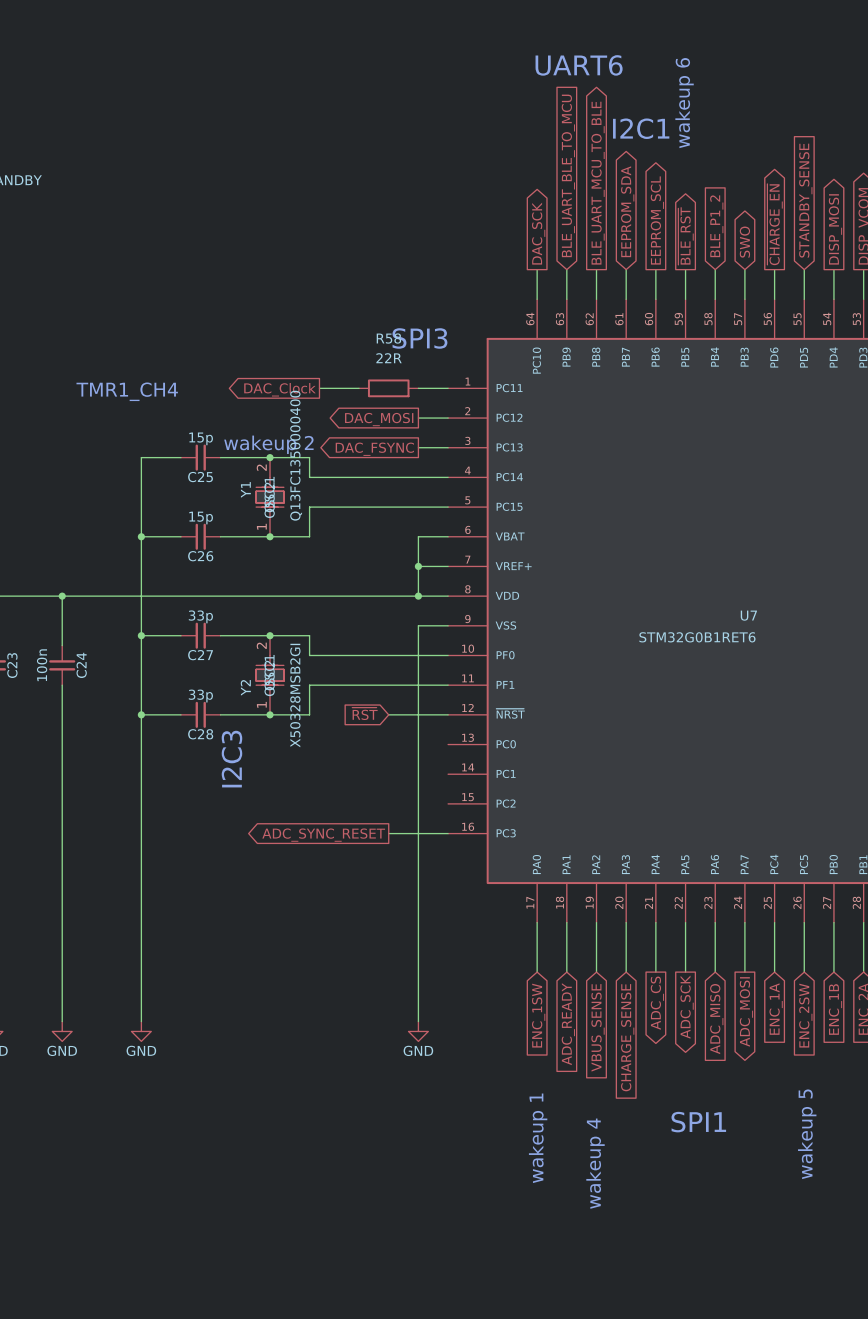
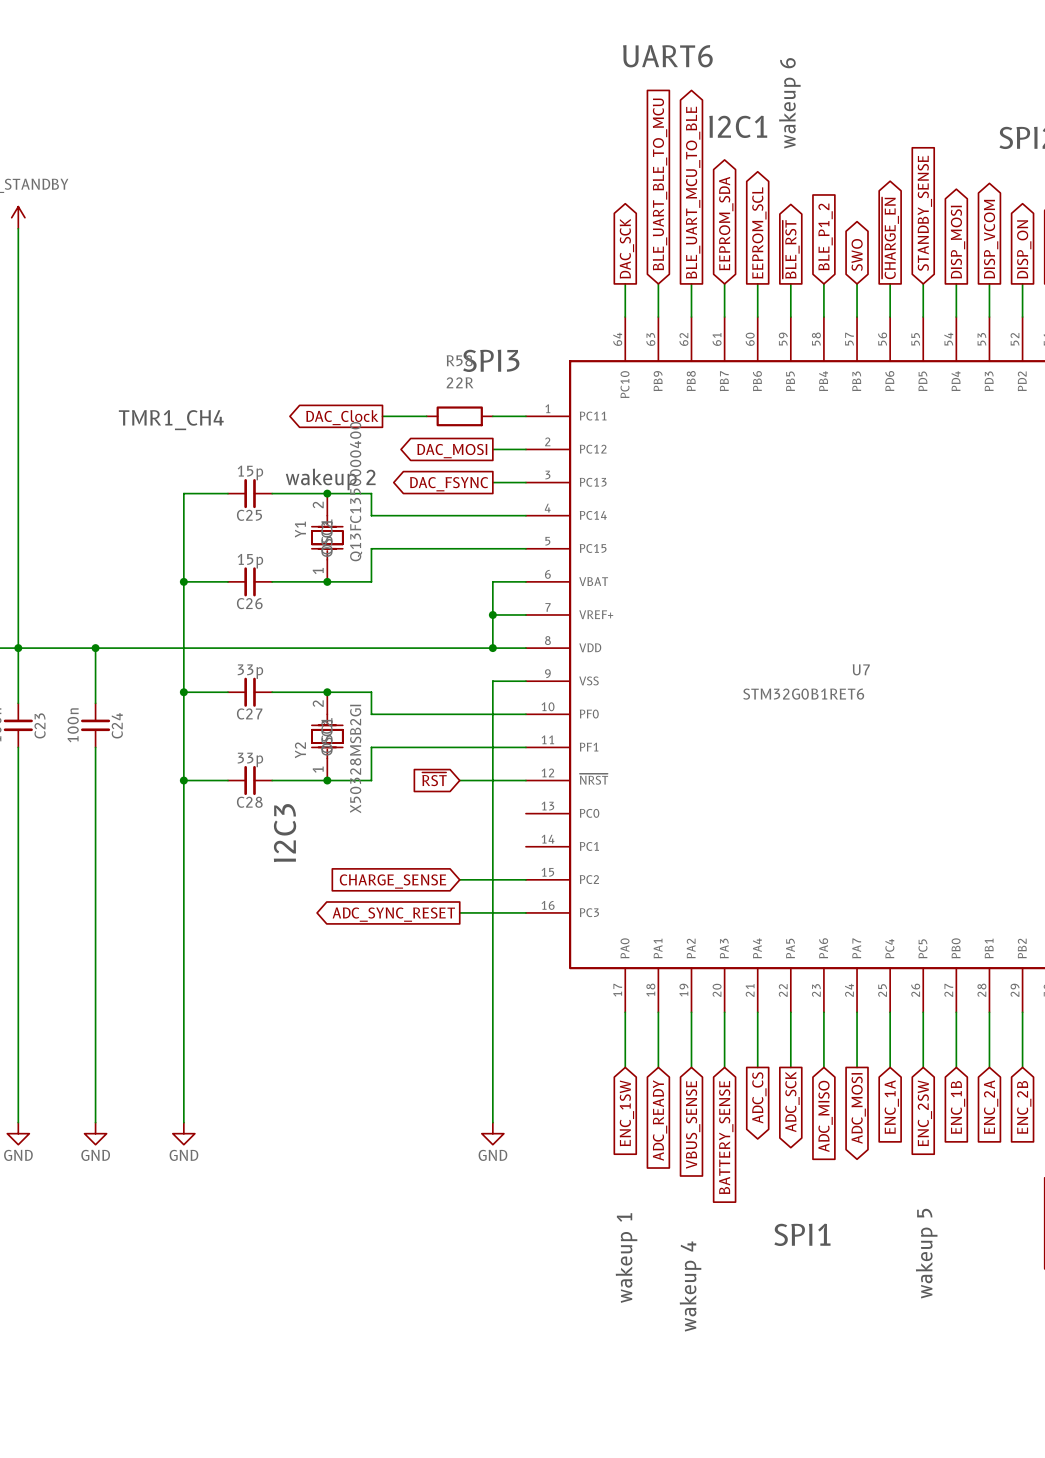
wire: none -> (459, 879) (525, 879)
global label: none -> CHARGE_SENSE (393, 881)
global label: CHARGE_SENSE (627, 1037) -> BATTERY_SENSE (726, 1137)

